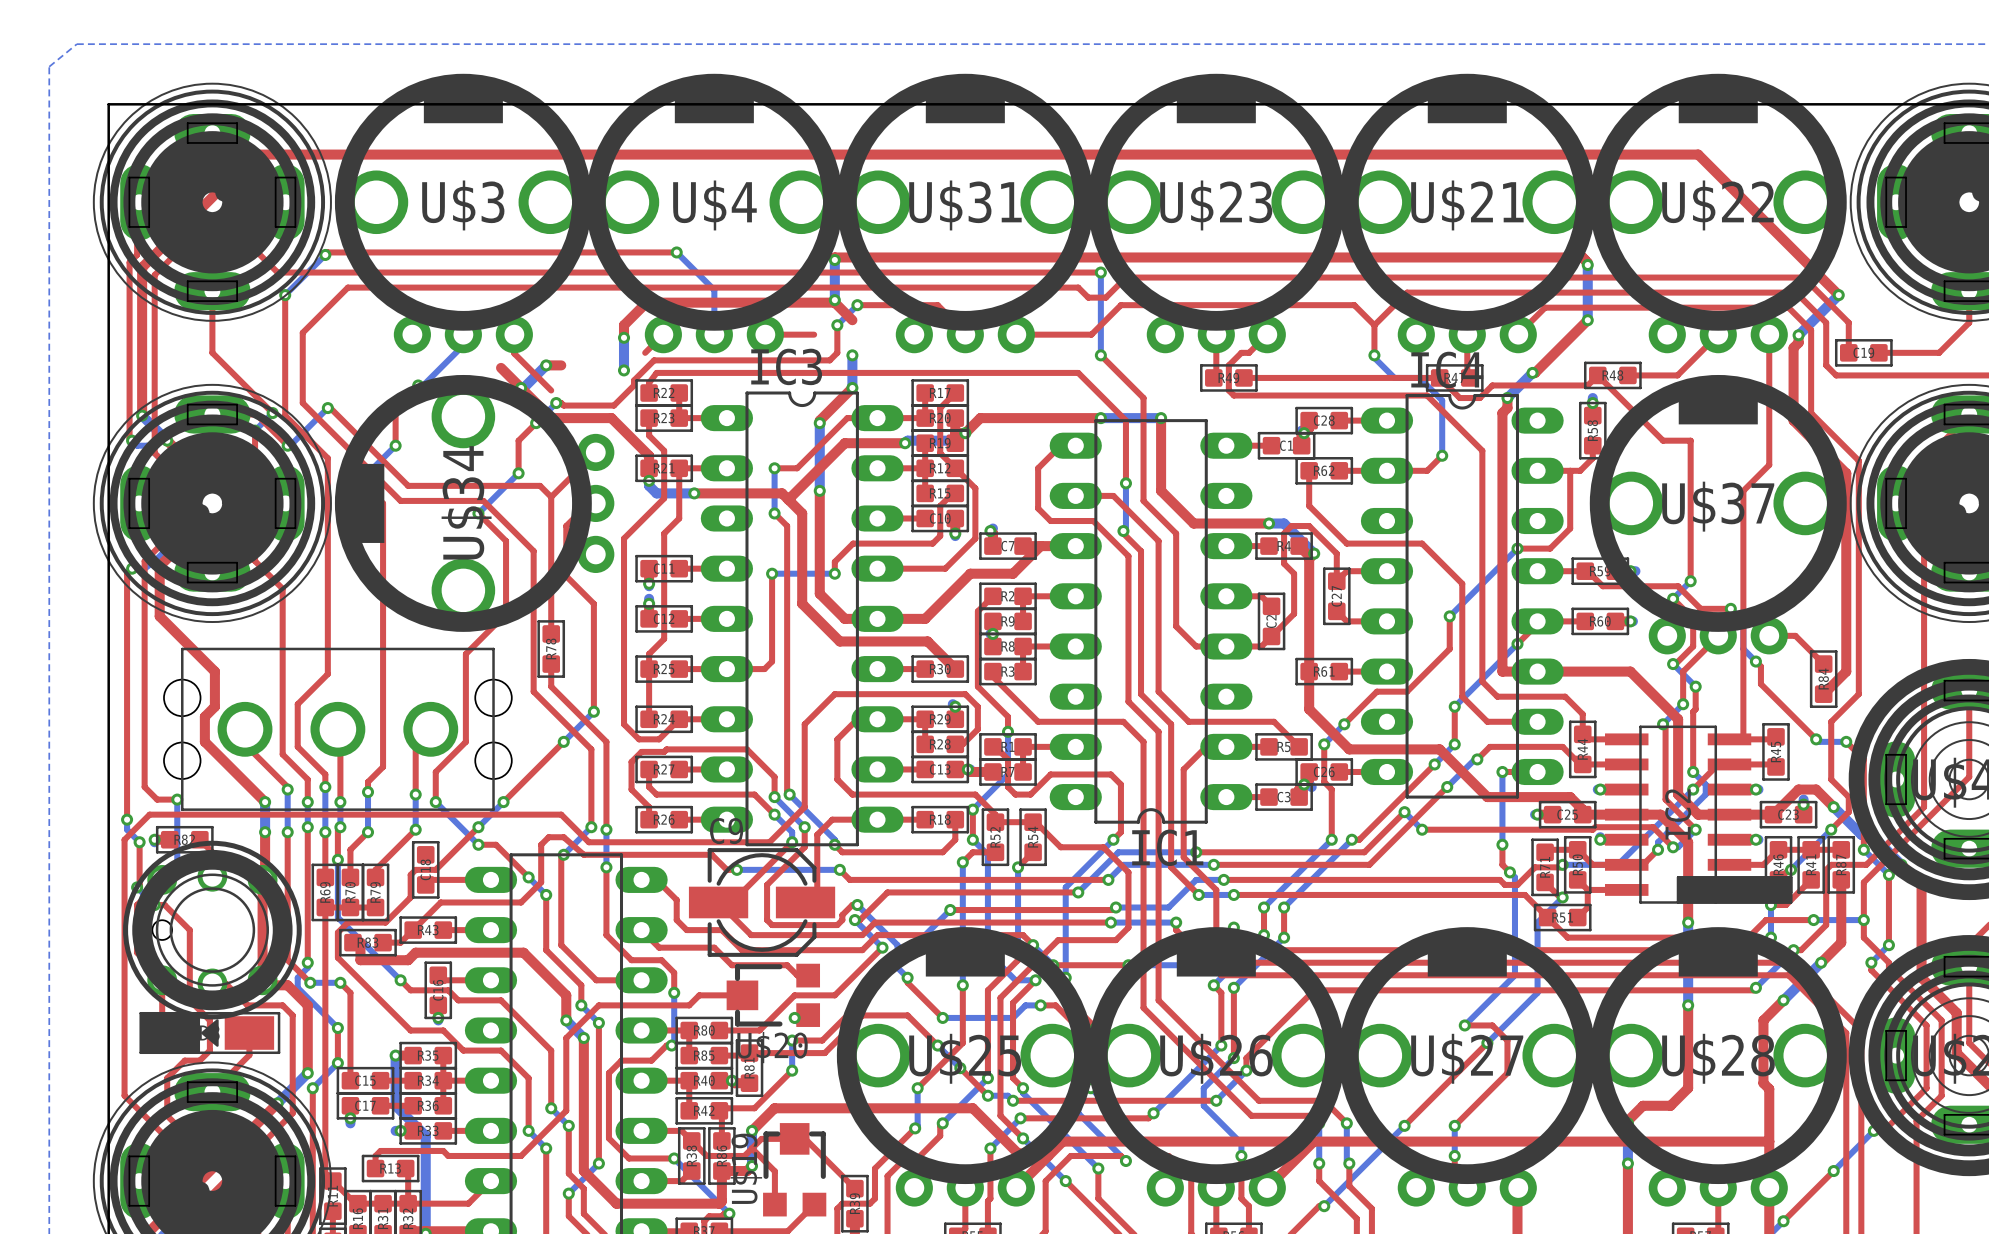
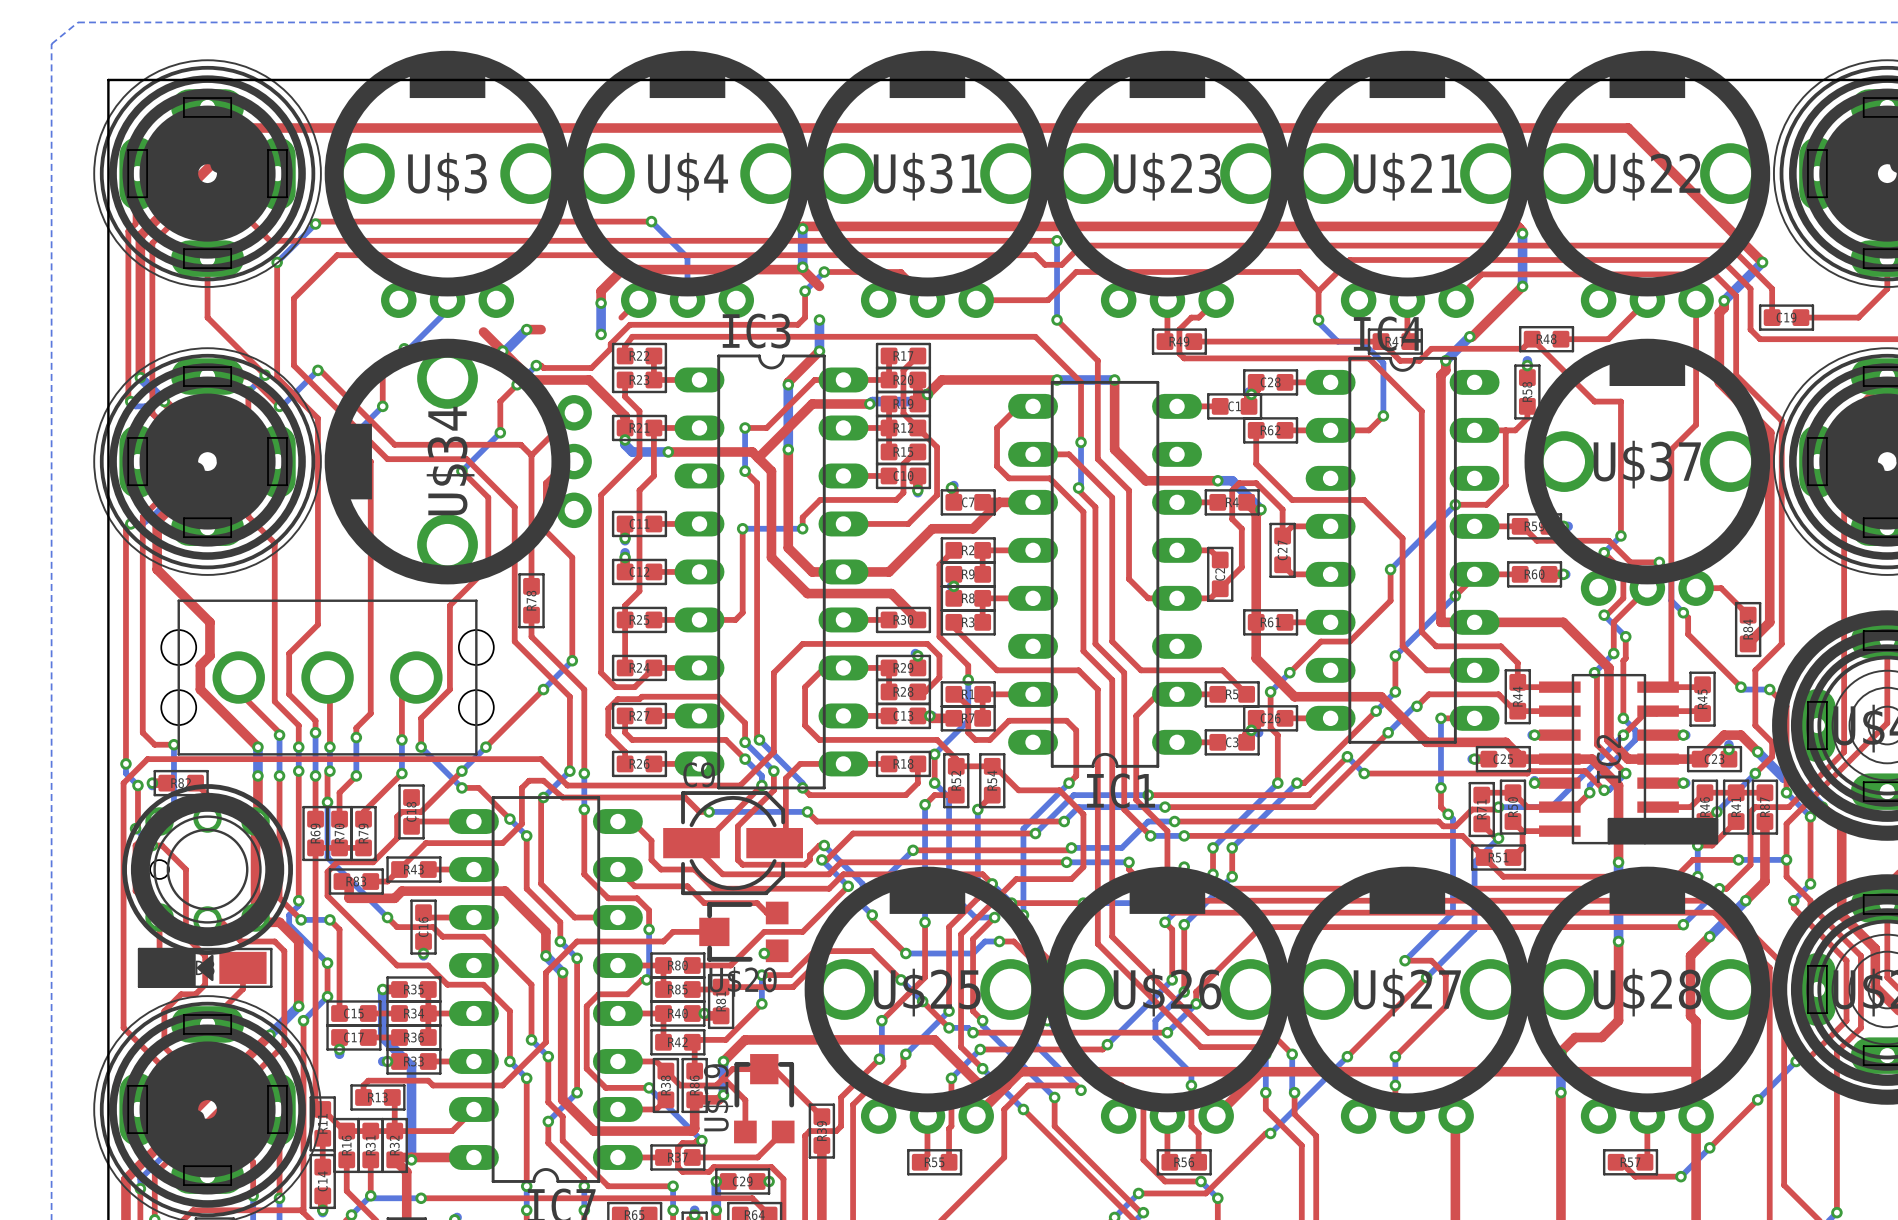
top track: (514, 334) (514, 353) (551, 390) -> none
top track: (765, 334) (814, 334) -> none

